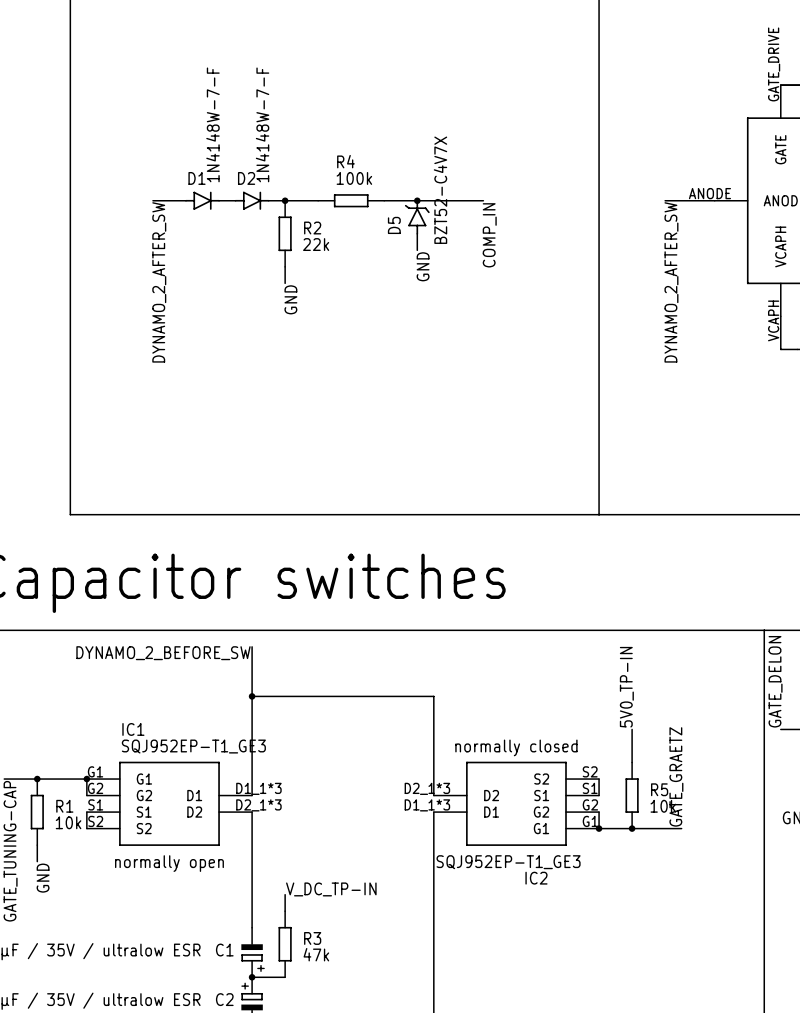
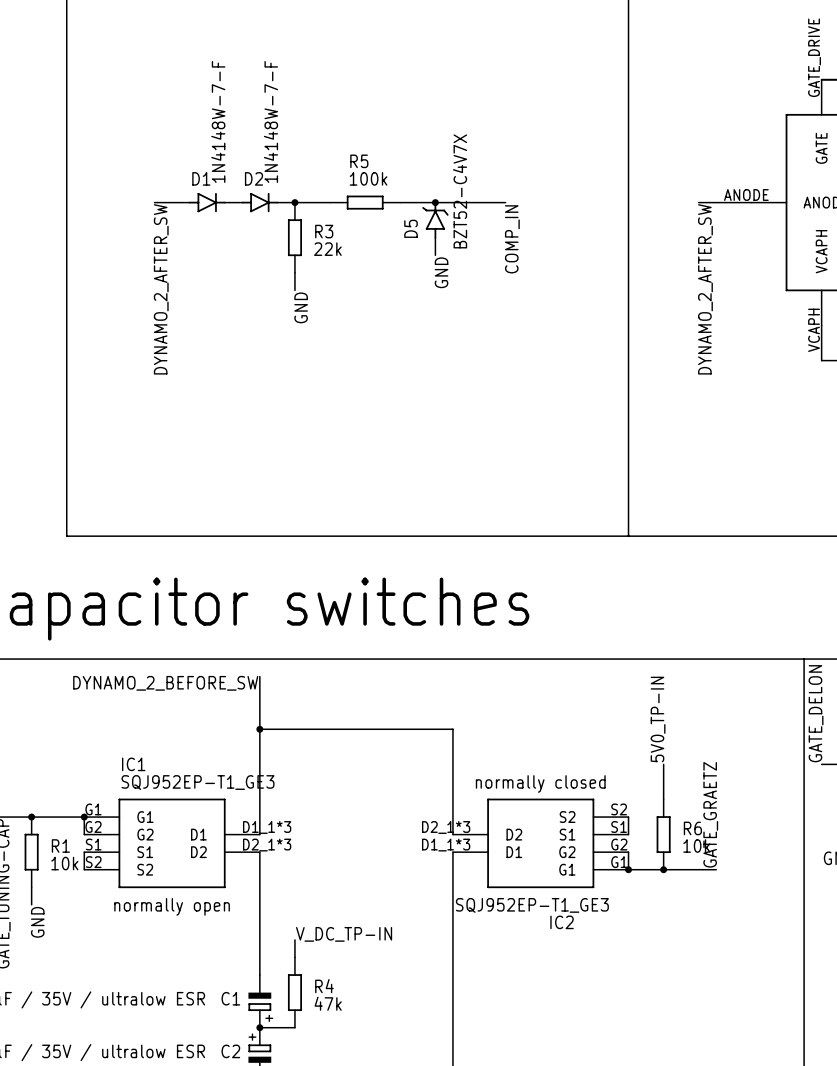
R4 name: R4 (345, 161) -> R5 (359, 161)
R2 name: R2 (312, 228) -> R3 (324, 231)
R5 name: R5 (659, 789) -> R6 (692, 828)
R3 name: R3 (312, 938) -> R4 (324, 986)

